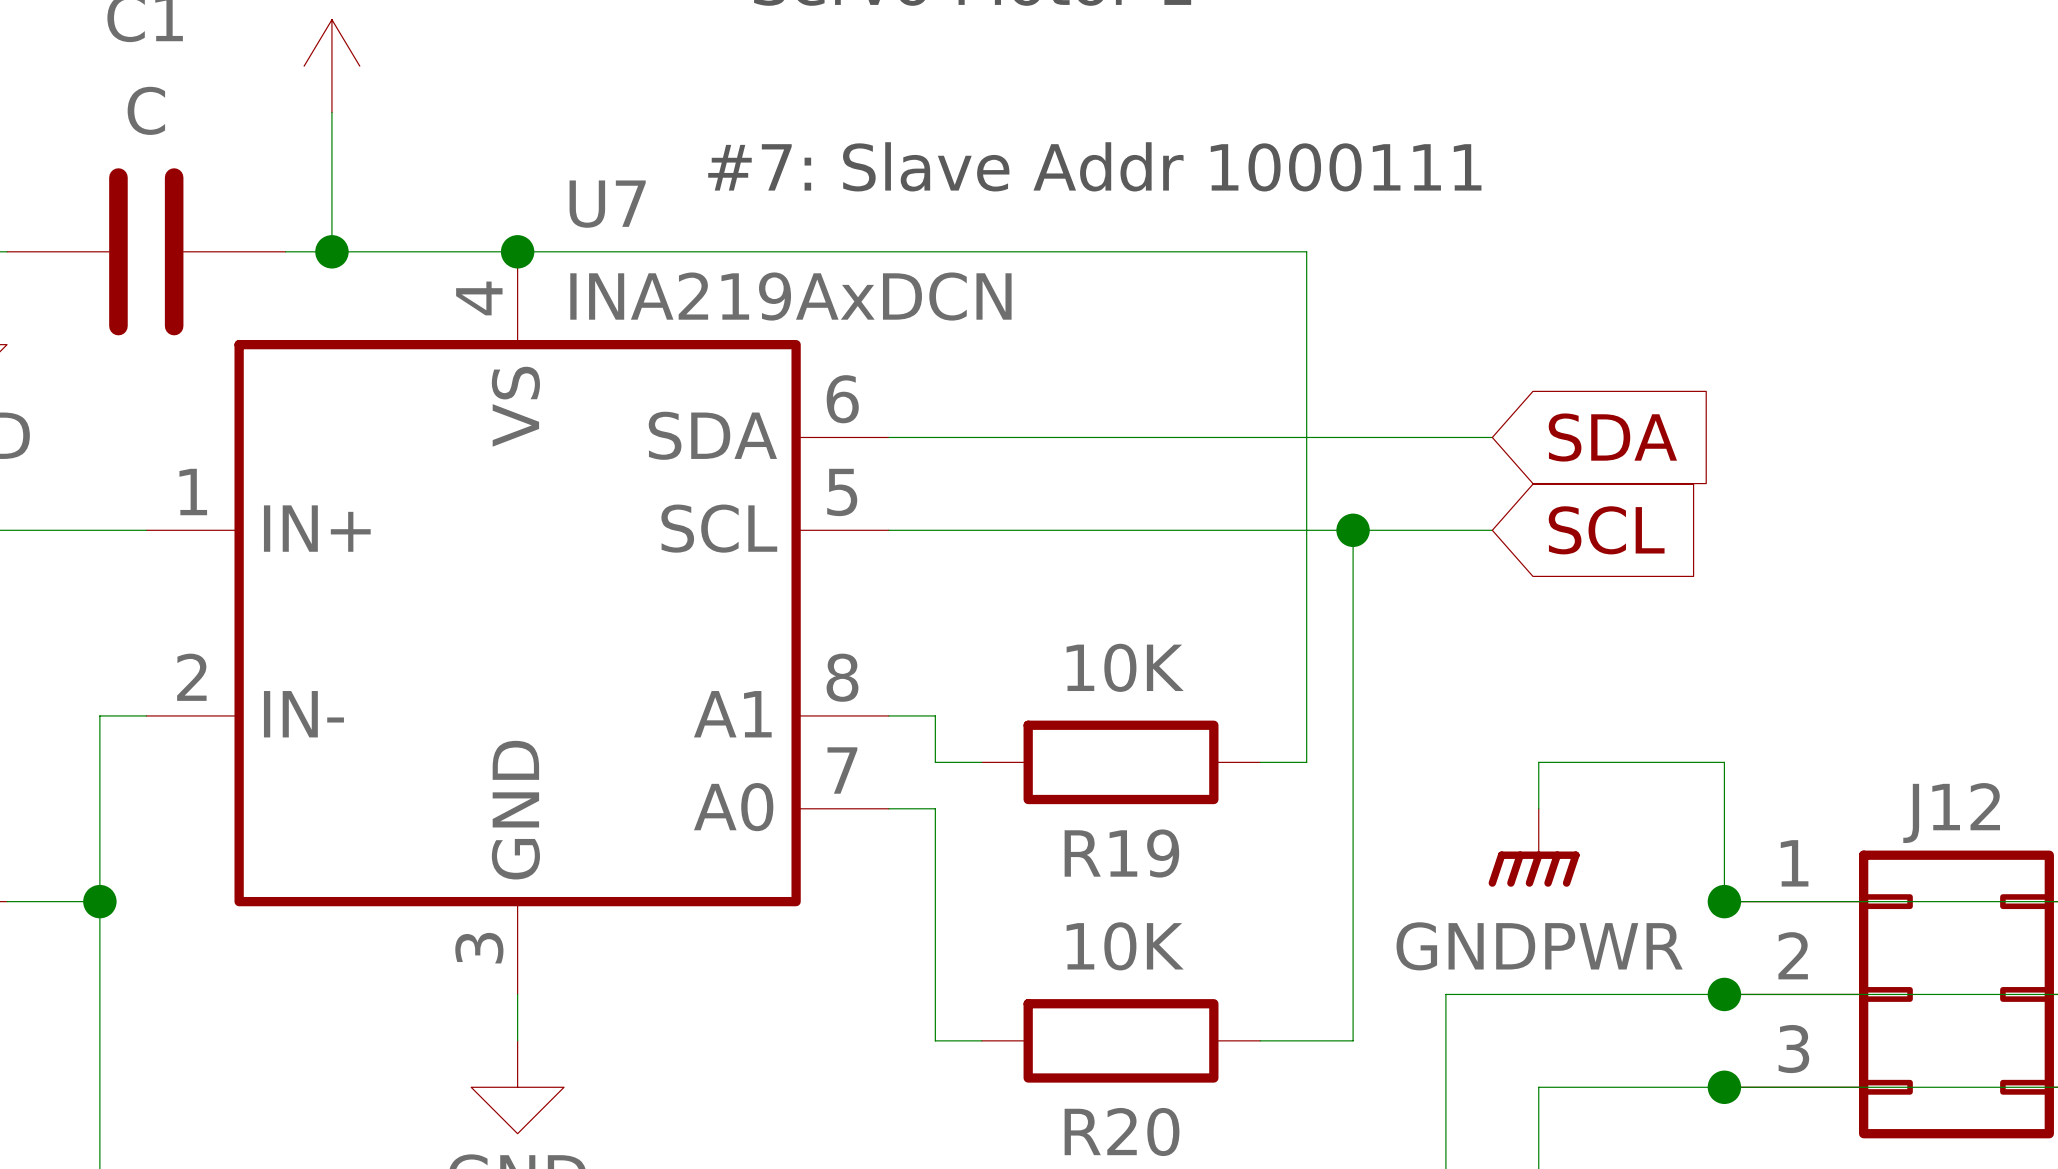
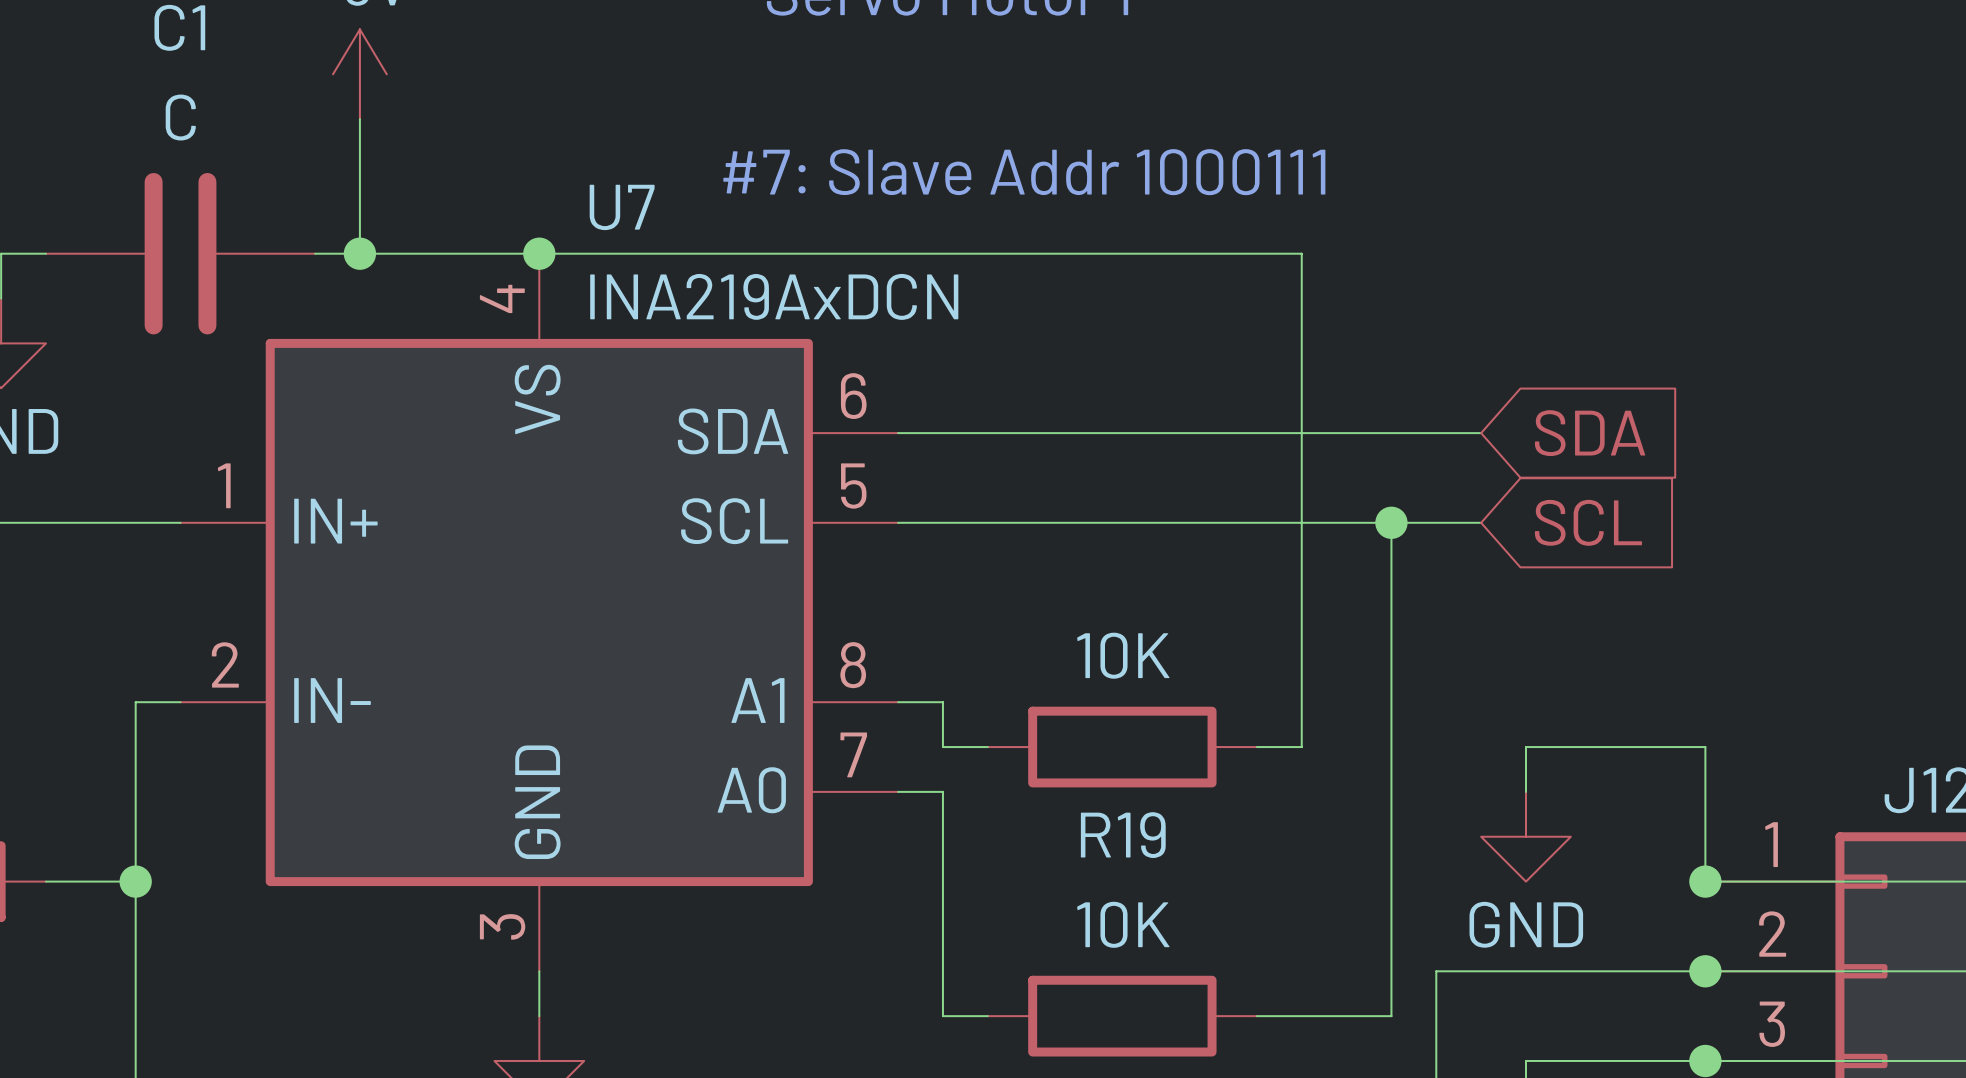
wire: (1353, 530) (1353, 1040) -> (1391, 522) (1391, 1016) (1346, 1016)
junction position: (1353, 530) -> (1391, 522)
power symbol: GNDPWR (1534, 847) -> GND (1525, 836)

